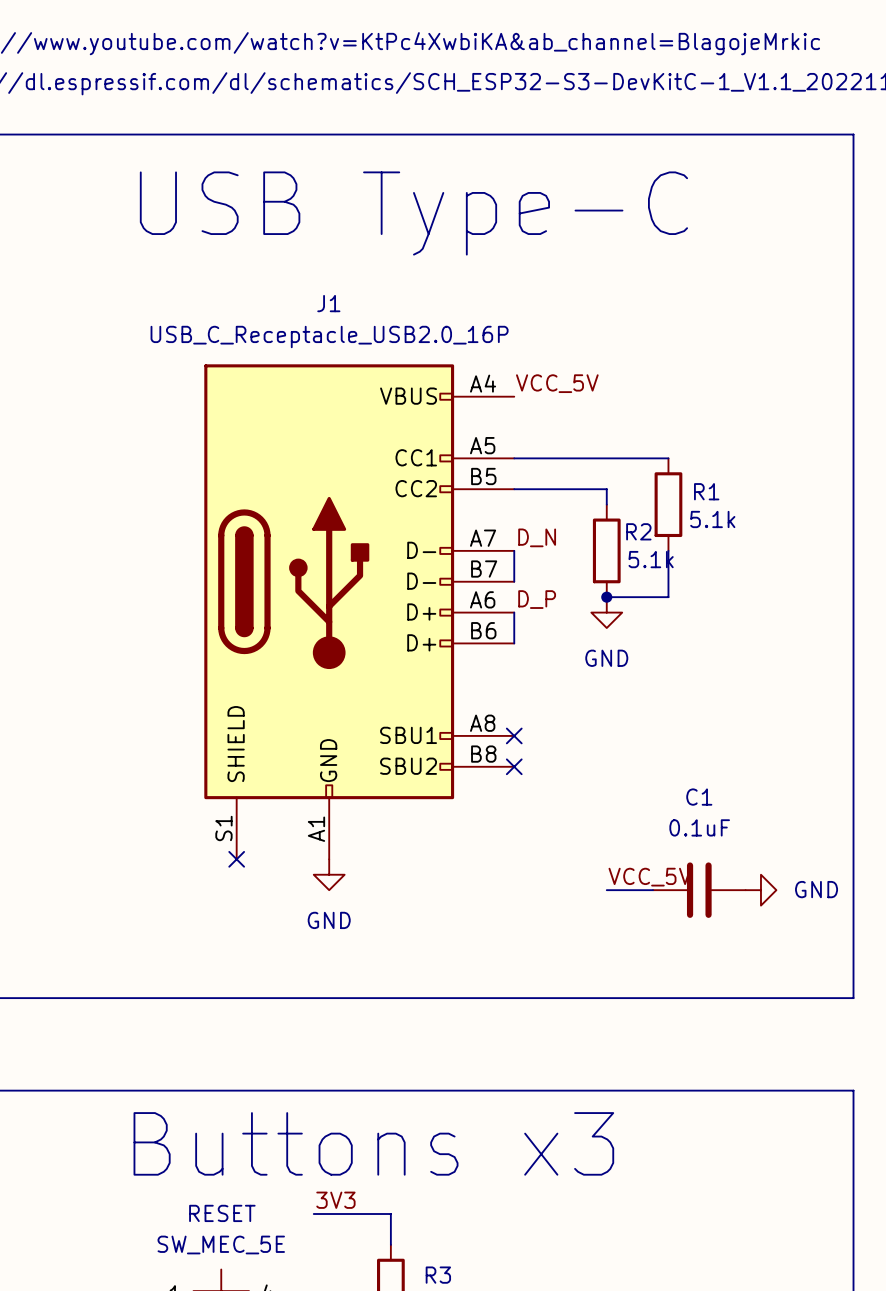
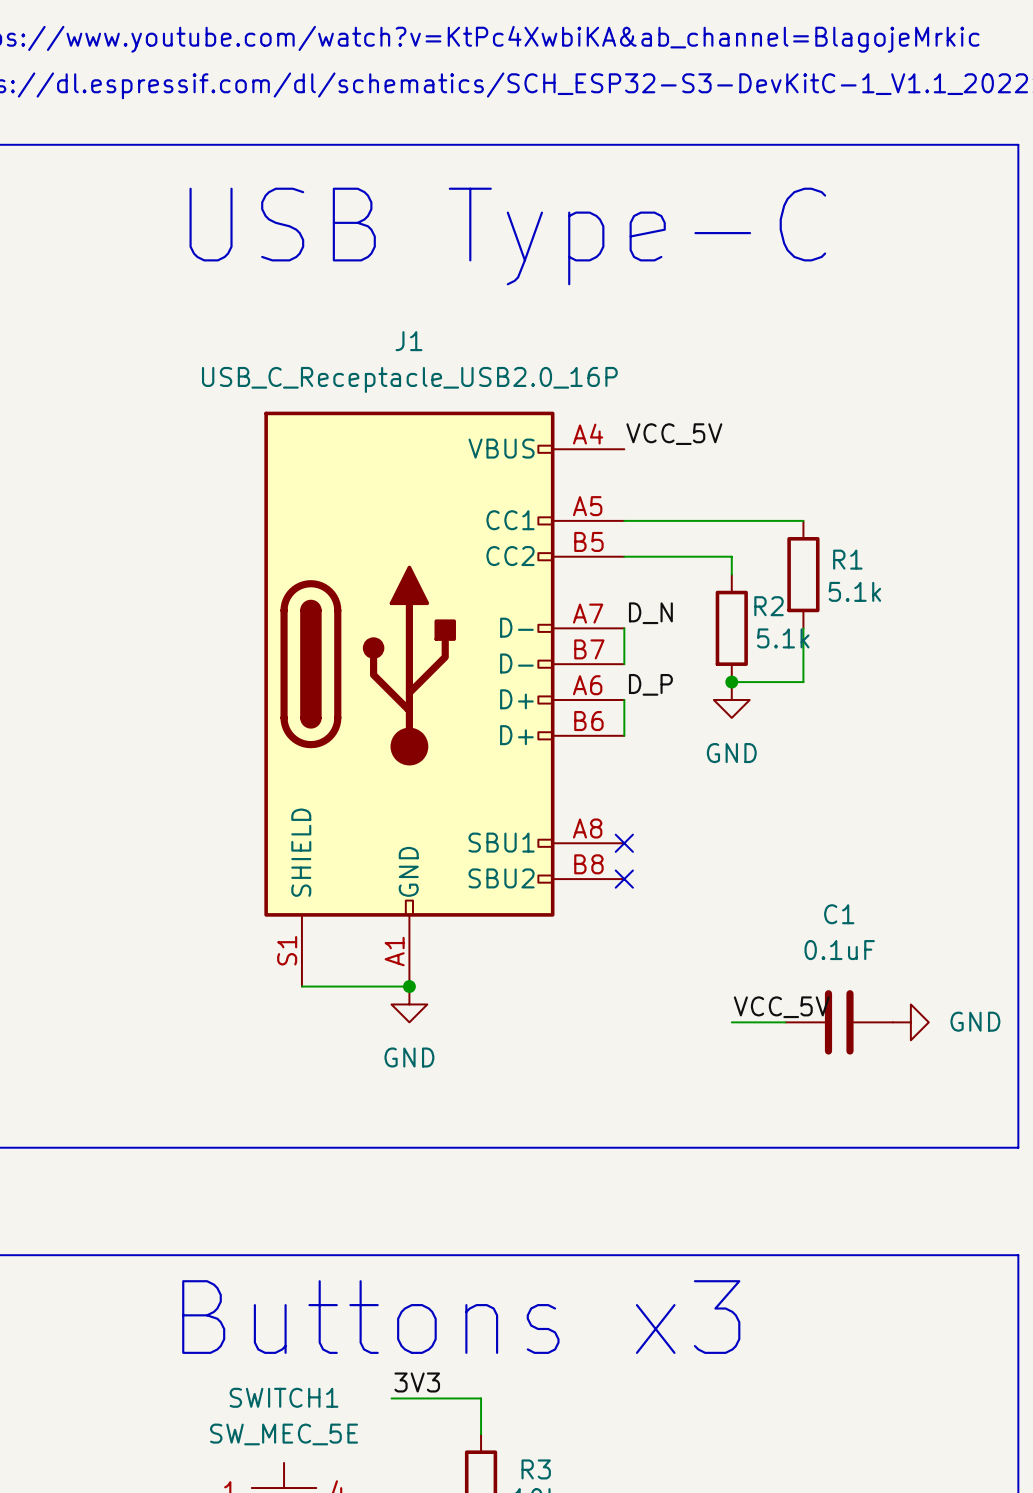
wire: none -> (301, 986) (409, 986)
no-connect mark: (236, 859) -> none
junction: none -> (409, 986)
RESET name: RESET (222, 1213) -> SWITCH1 (284, 1397)

